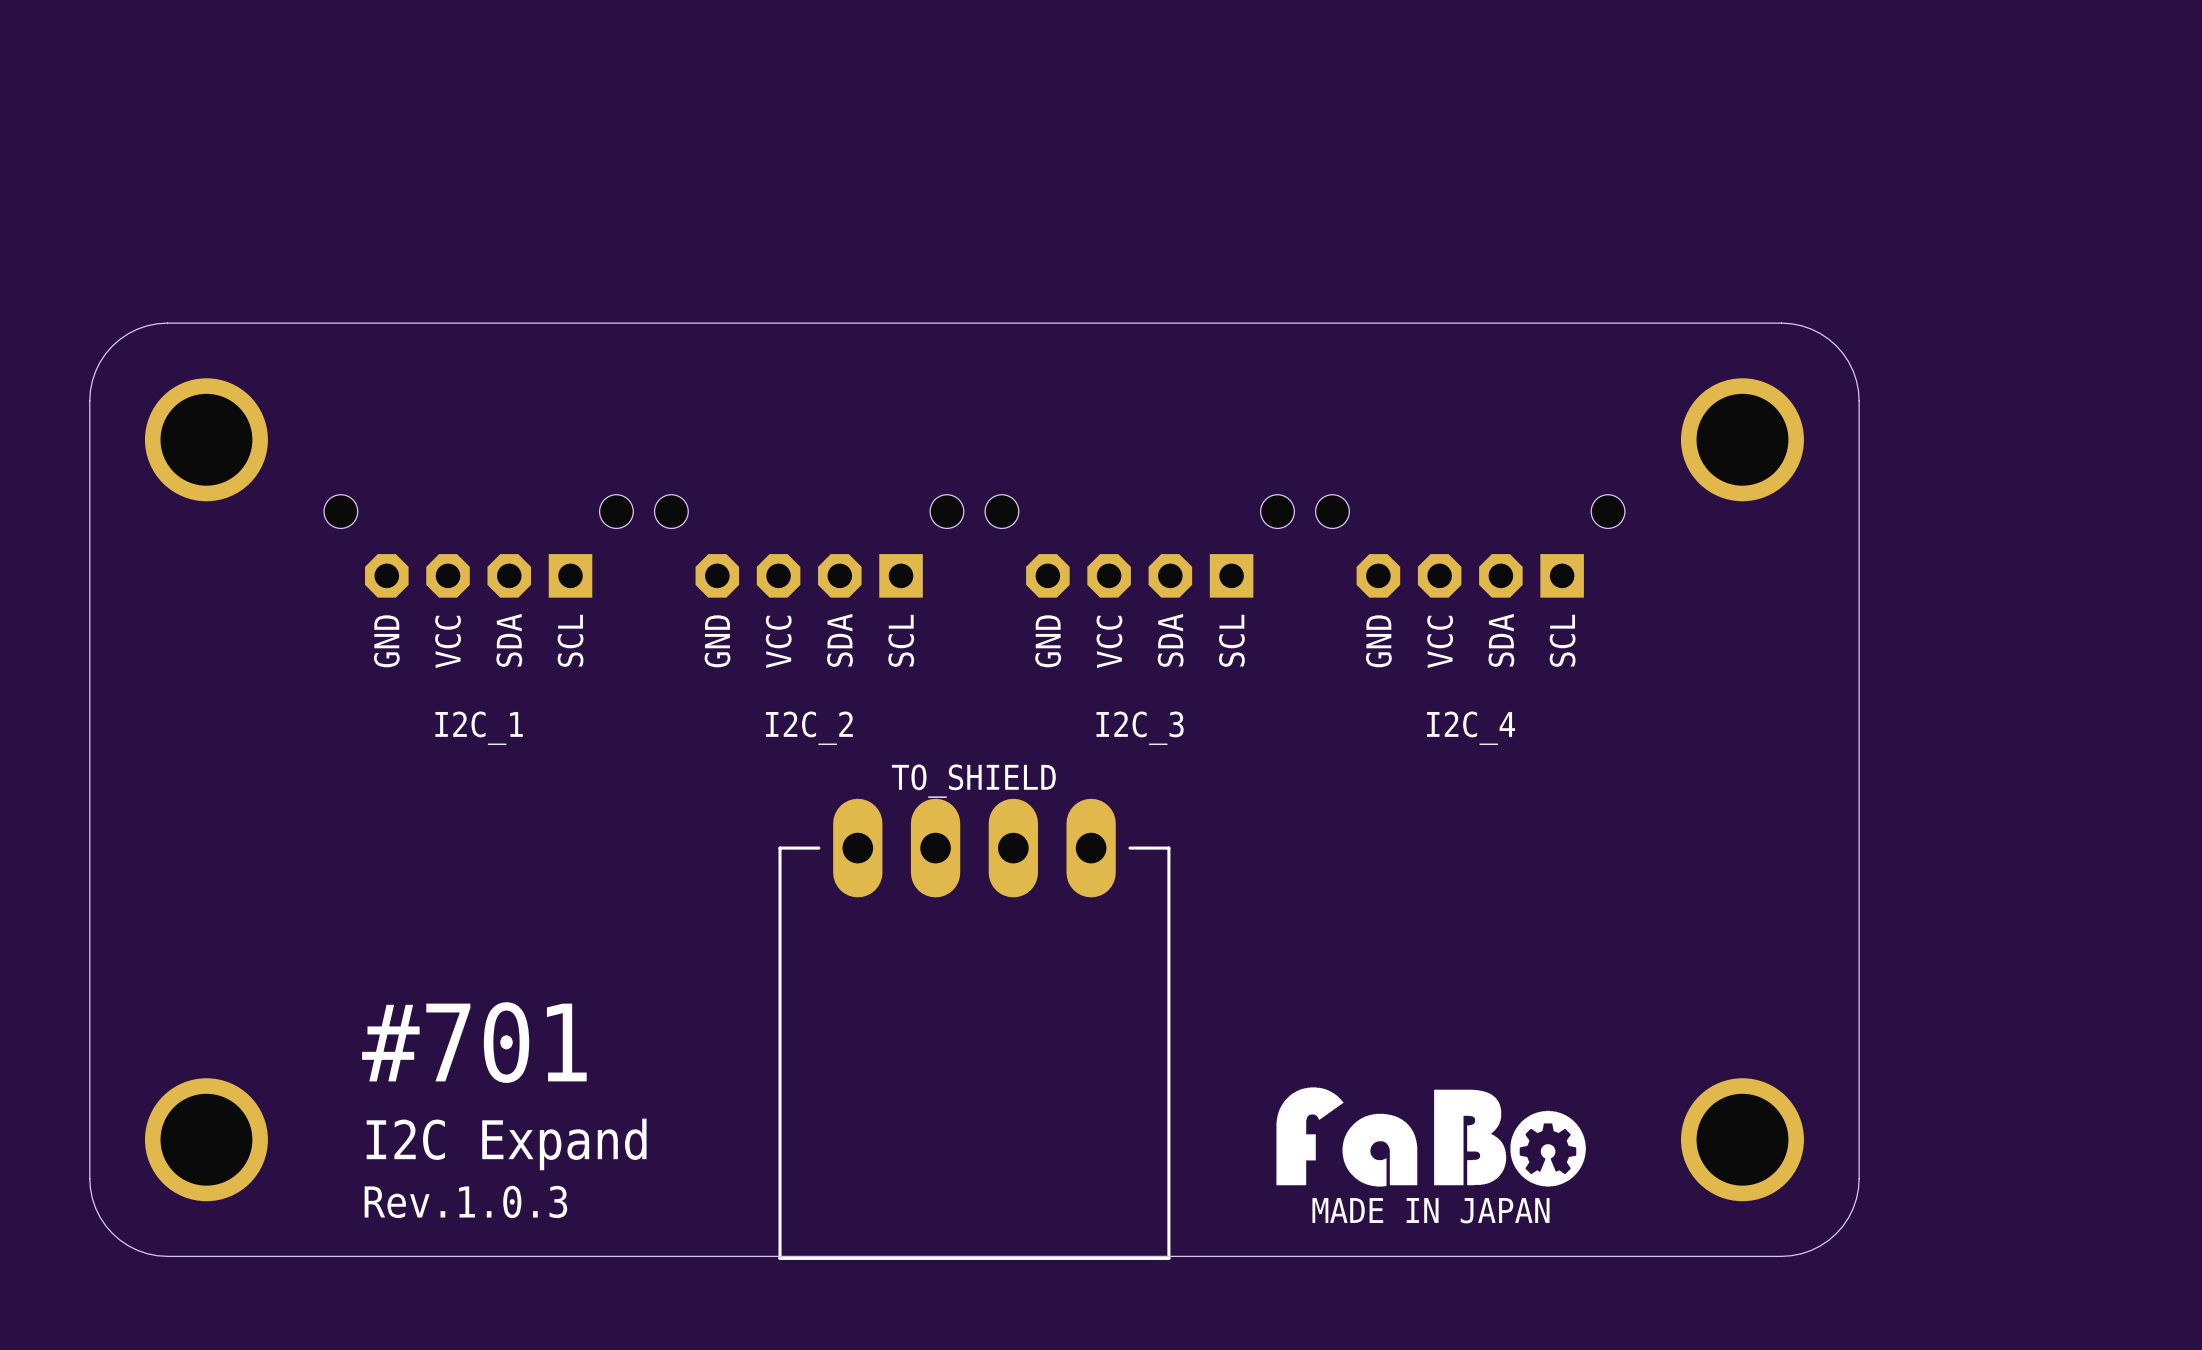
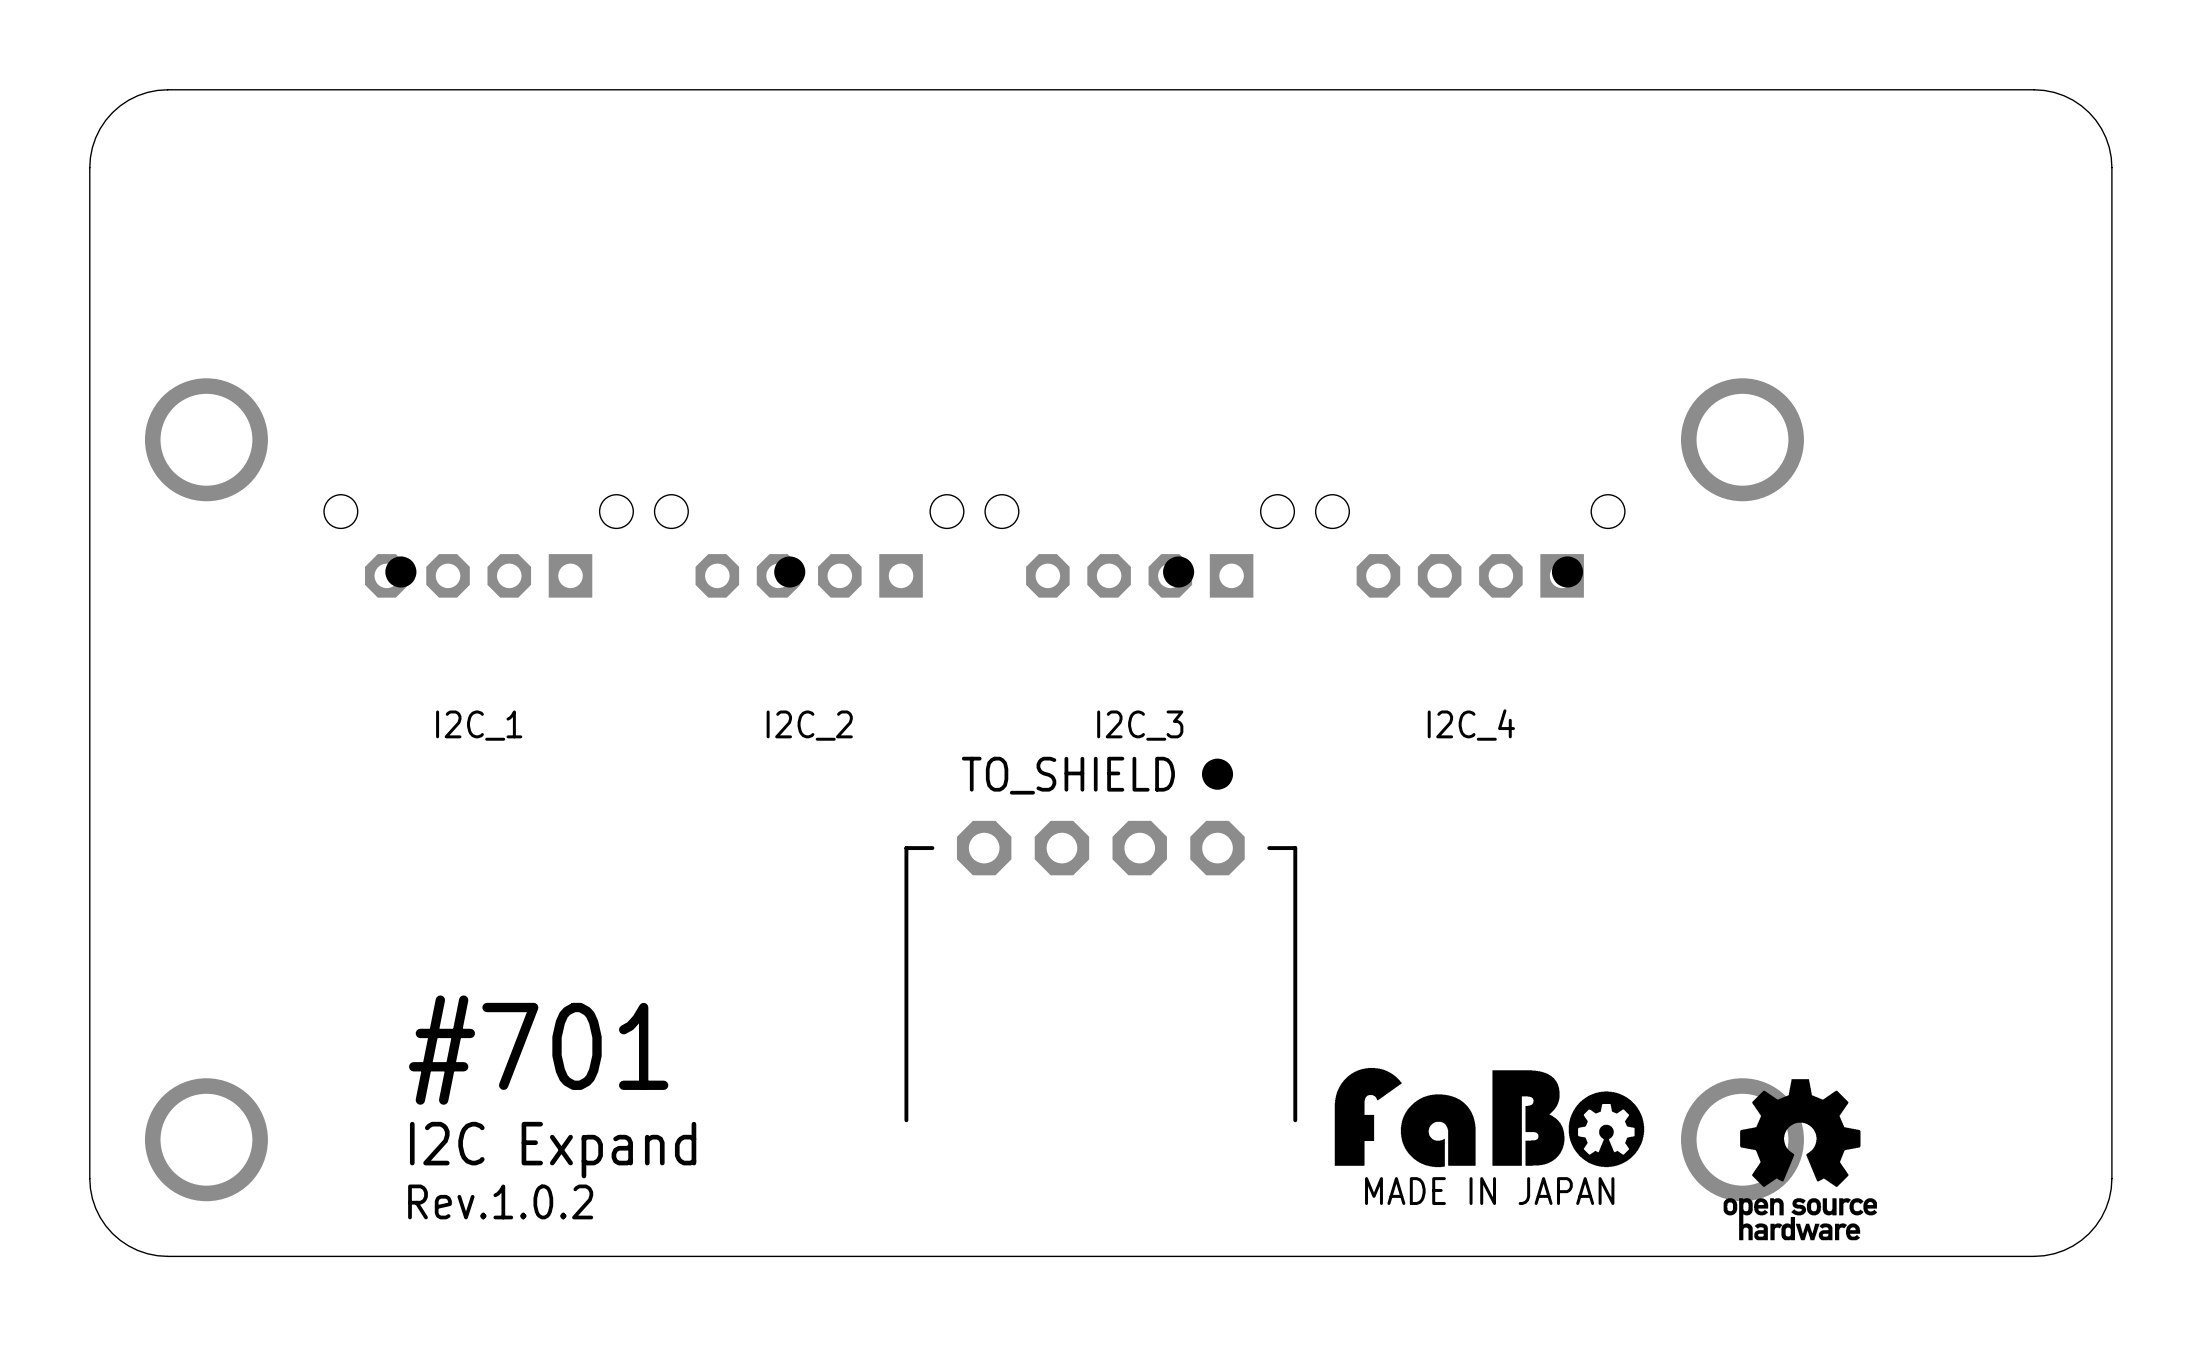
board edge: (89, 400) (95, 371) (112, 345) (137, 329) (167, 323) (1781, 323) (1801, 325) (1820, 333) (1836, 345) (1848, 361) (1856, 380) (1859, 400) (1859, 1178) (1853, 1208) (1836, 1233) (1811, 1250) (1781, 1256) -> (89, 400) (89, 167) (92, 147) (100, 128) (112, 112) (137, 95) (157, 90) (2034, 89) (2054, 92) (2073, 100) (2089, 112) (2101, 128) (2109, 147) (2111, 167) (2111, 1178) (2109, 1198) (2101, 1217) (2089, 1233) (2063, 1250) (2044, 1255) (1781, 1256)
drawing: none -> [385, 556, 417, 588]
drawing: none -> [774, 556, 806, 588]
drawing: none -> [1163, 556, 1195, 588]
drawing: none -> [1551, 556, 1584, 588]
text: SDA (509, 640) -> none
text: SCL (570, 640) -> none
text: SDA (839, 640) -> none
text: SCL (901, 640) -> none
text: SDA (1170, 640) -> none
text: SCL (1231, 640) -> none
text: SDA (1501, 640) -> none
text: SCL (1562, 640) -> none
text: GND (386, 641) -> none
text: VCC (448, 641) -> none
text: GND (717, 641) -> none
text: VCC (778, 641) -> none
text: GND (1048, 641) -> none
text: VCC (1109, 641) -> none
text: GND (1378, 641) -> none
text: VCC (1440, 641) -> none
drawing: none -> [1201, 758, 1234, 790]
TO_SHIELD: none -> (1100, 971)
TO_SHIELD: (974, 1029) -> none
text position: #701 (474, 1042) -> #701 (538, 1050)
drawing: none -> [1723, 1079, 1877, 1241]
drawing position: (1431, 1136) -> (1489, 1117)
text position: I2C Expand (506, 1144) -> I2C Expand (553, 1150)
text: Rev.1.0.3 (465, 1201) -> Rev.1.0.2 (500, 1201)
text position: MADE IN JAPAN (1430, 1210) -> MADE IN JAPAN (1489, 1191)

